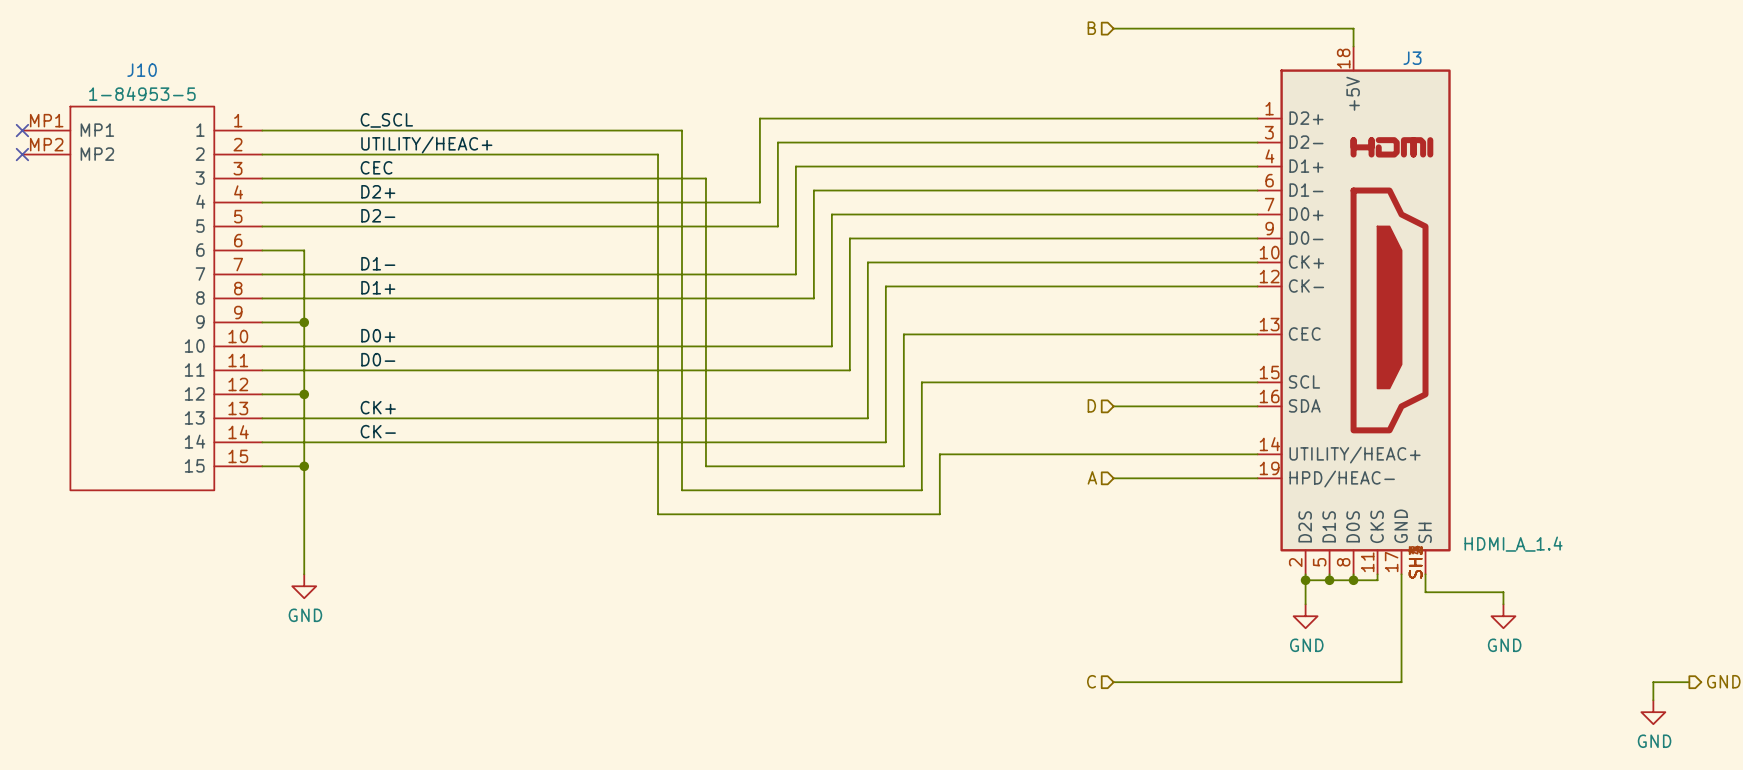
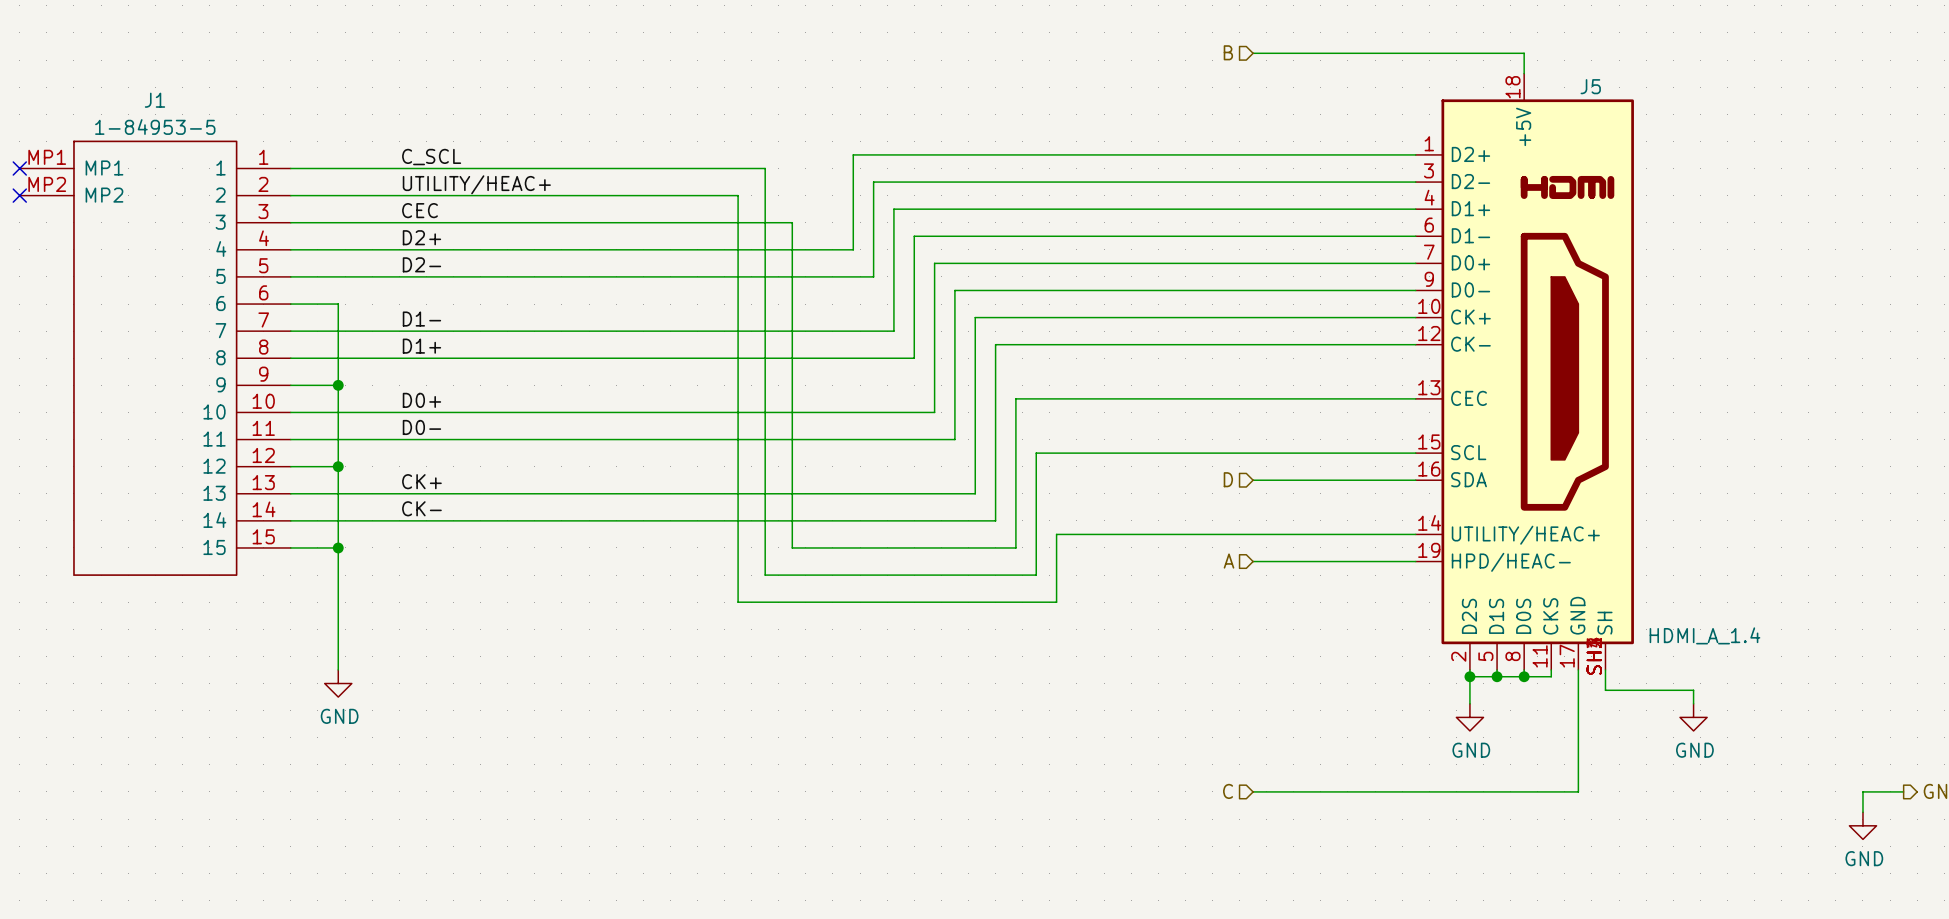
J3 name: J3 (1412, 58) -> J5 (1590, 86)
J10 name: J10 (142, 70) -> J1 (154, 100)

